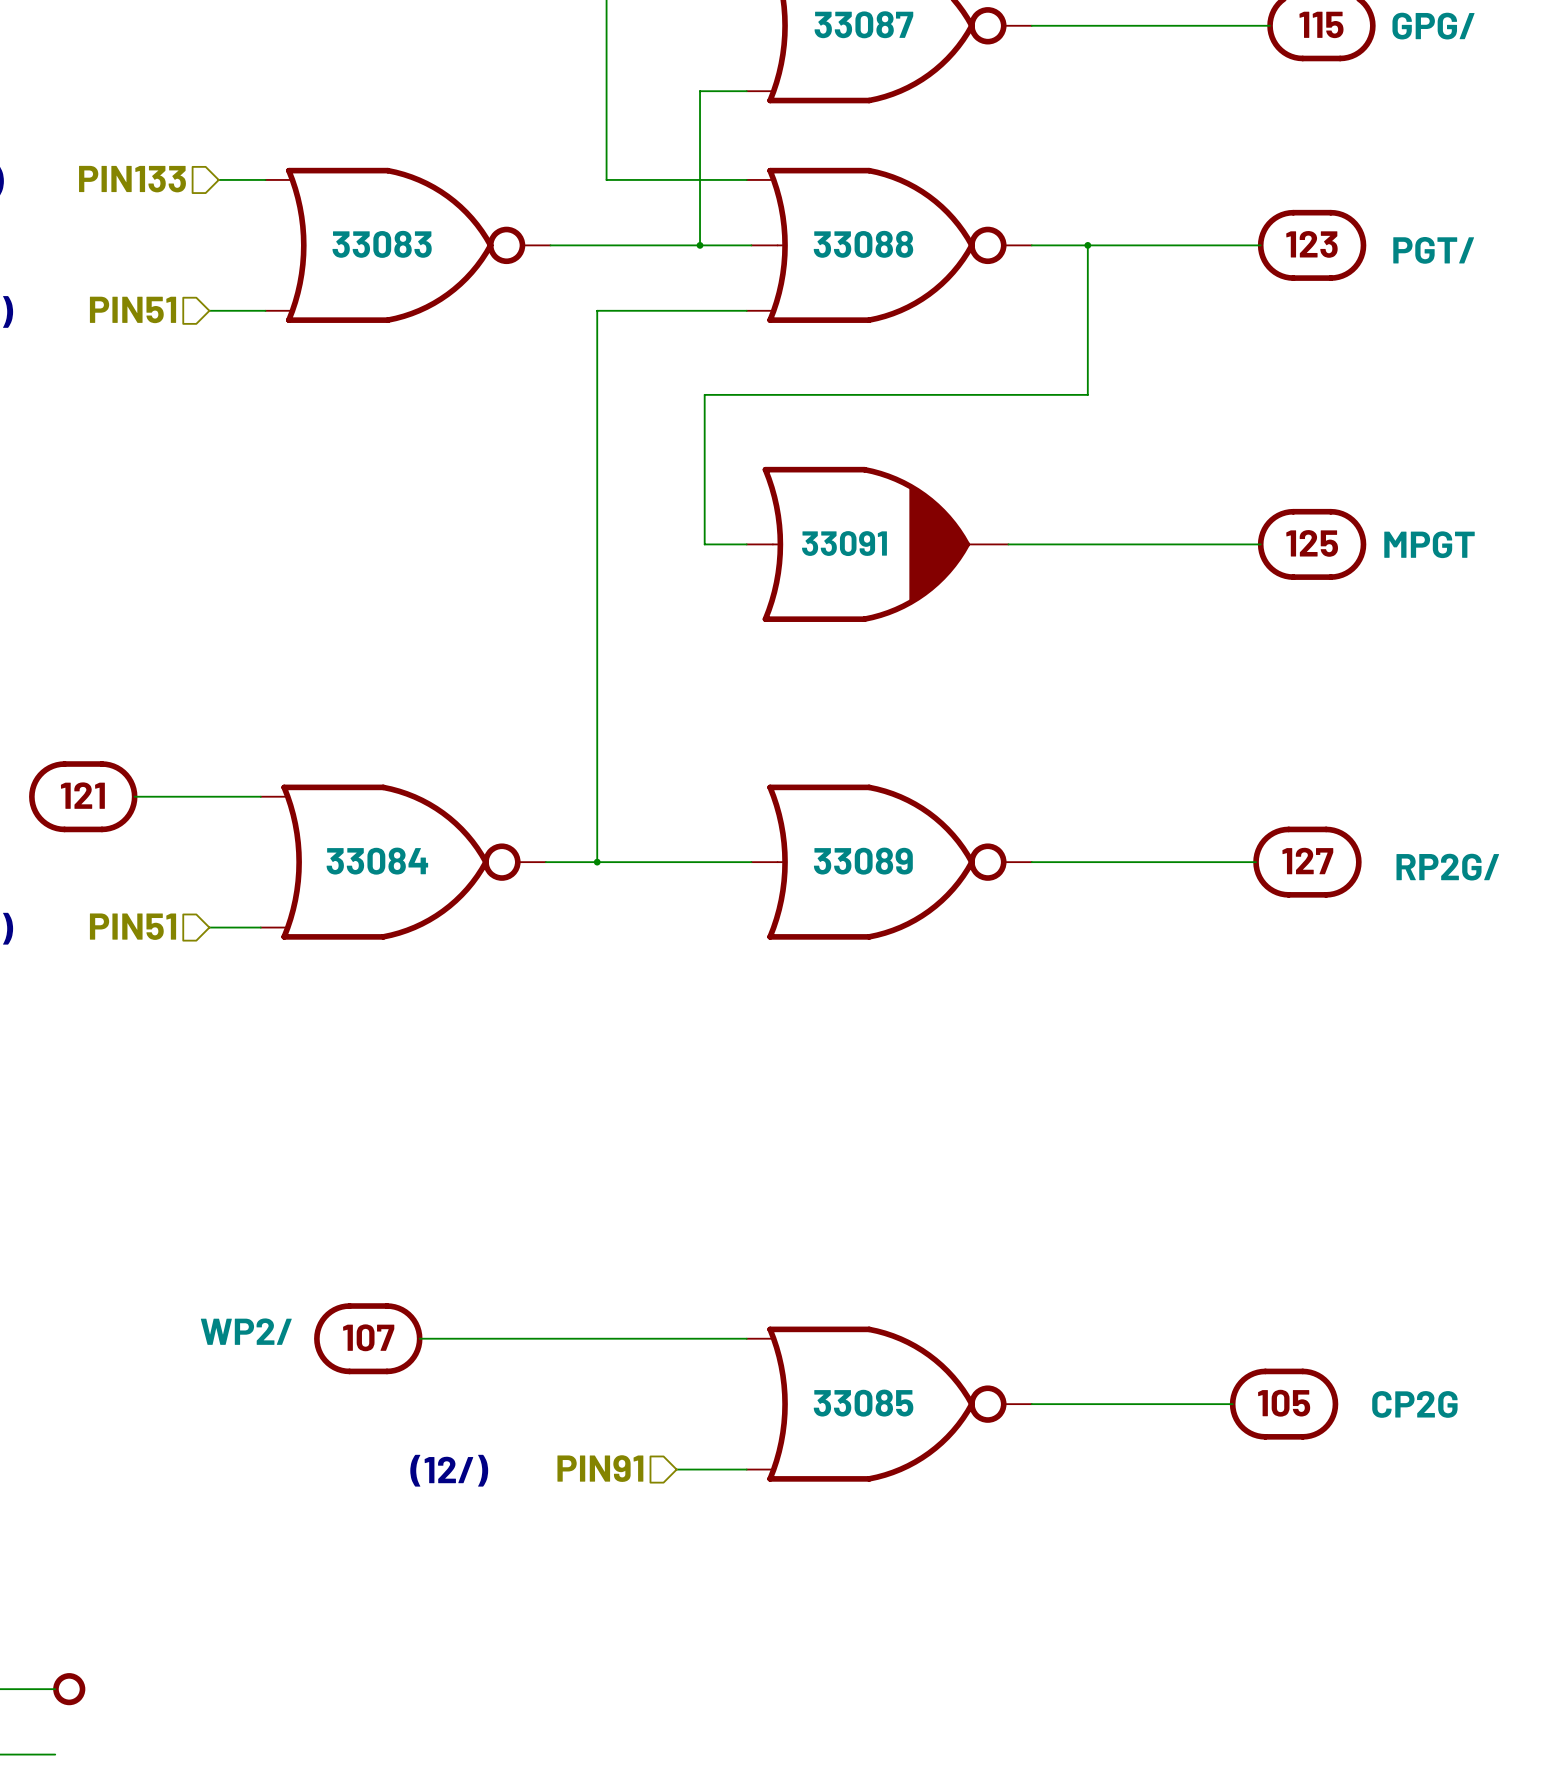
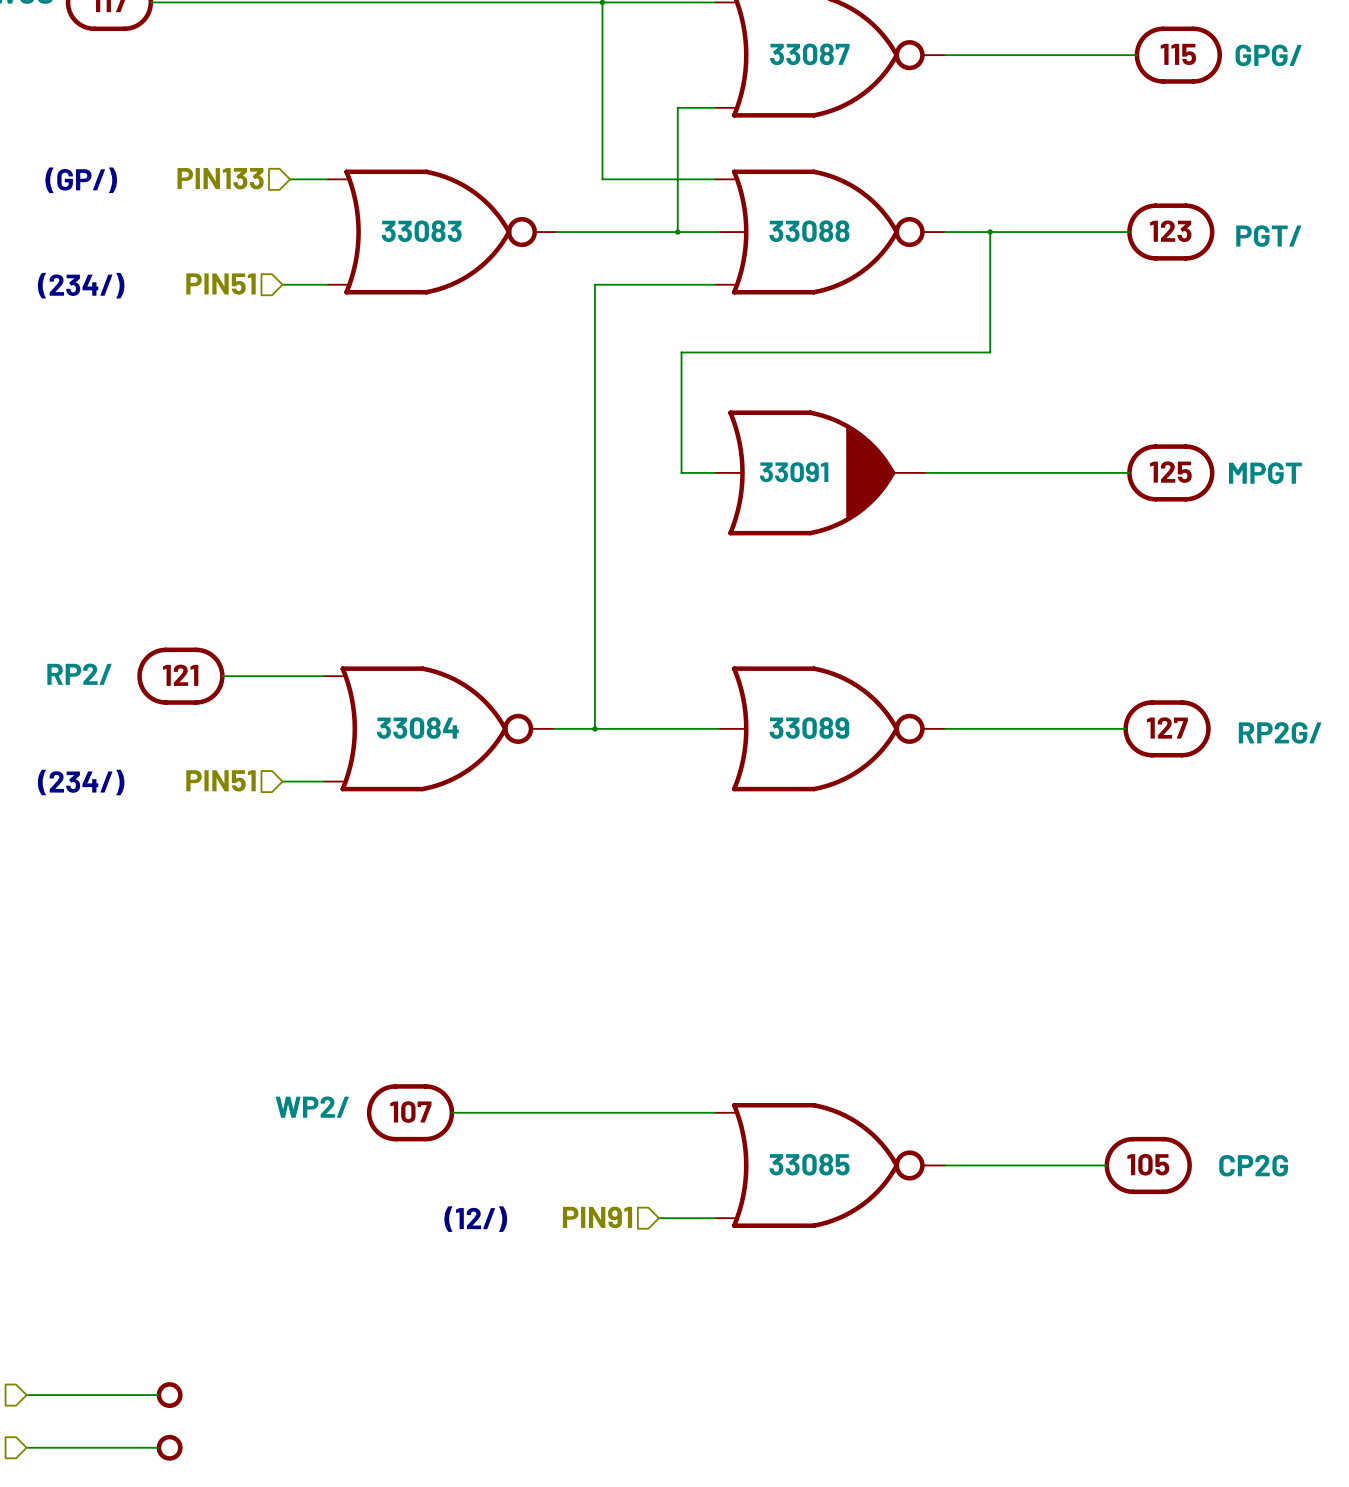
part: none -> (169, 1447)

